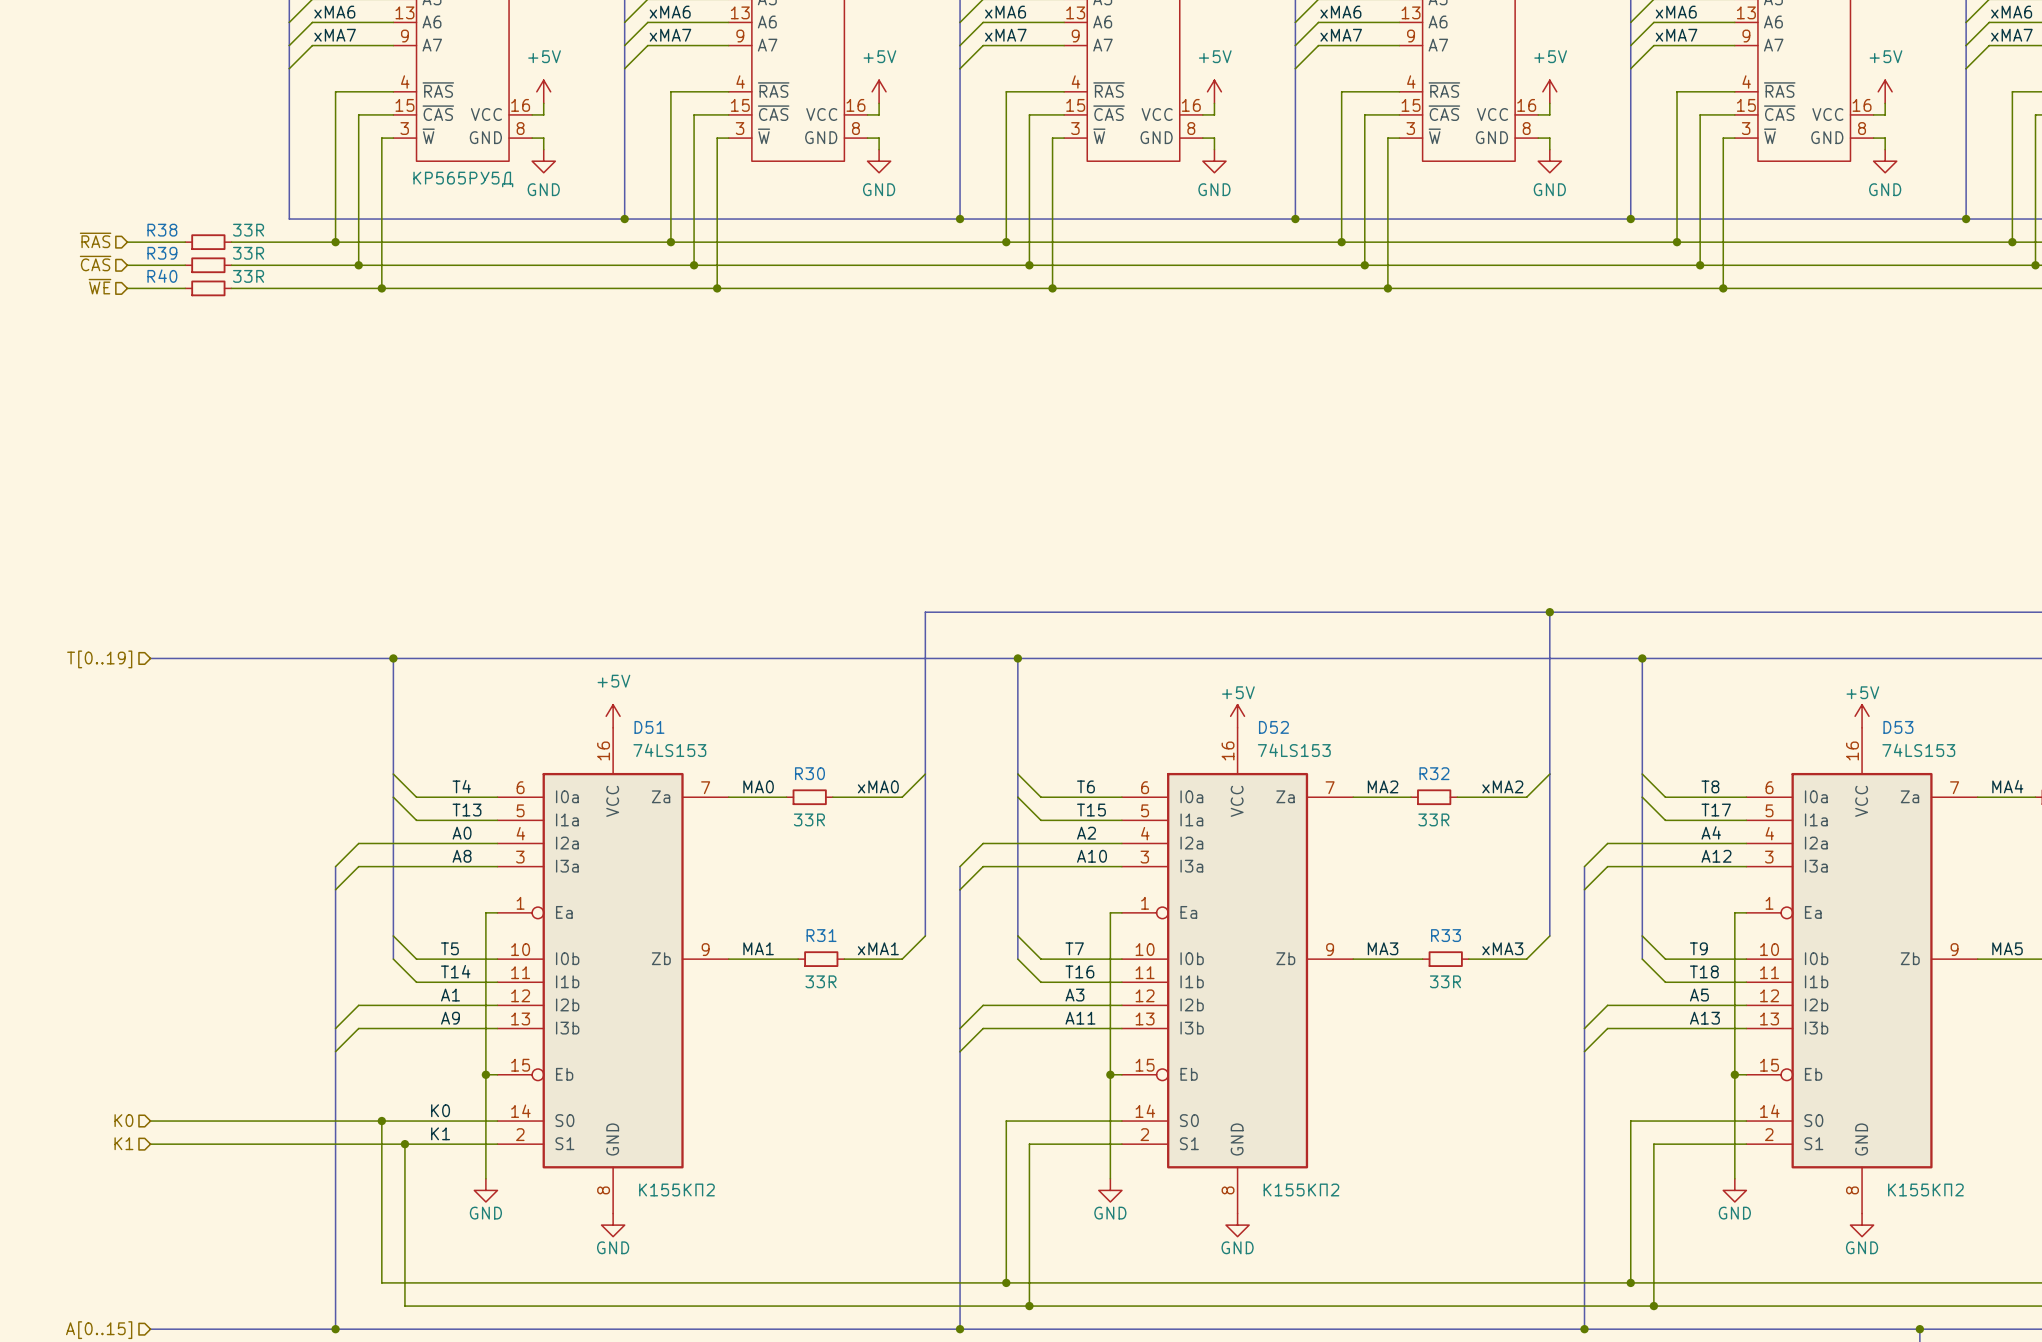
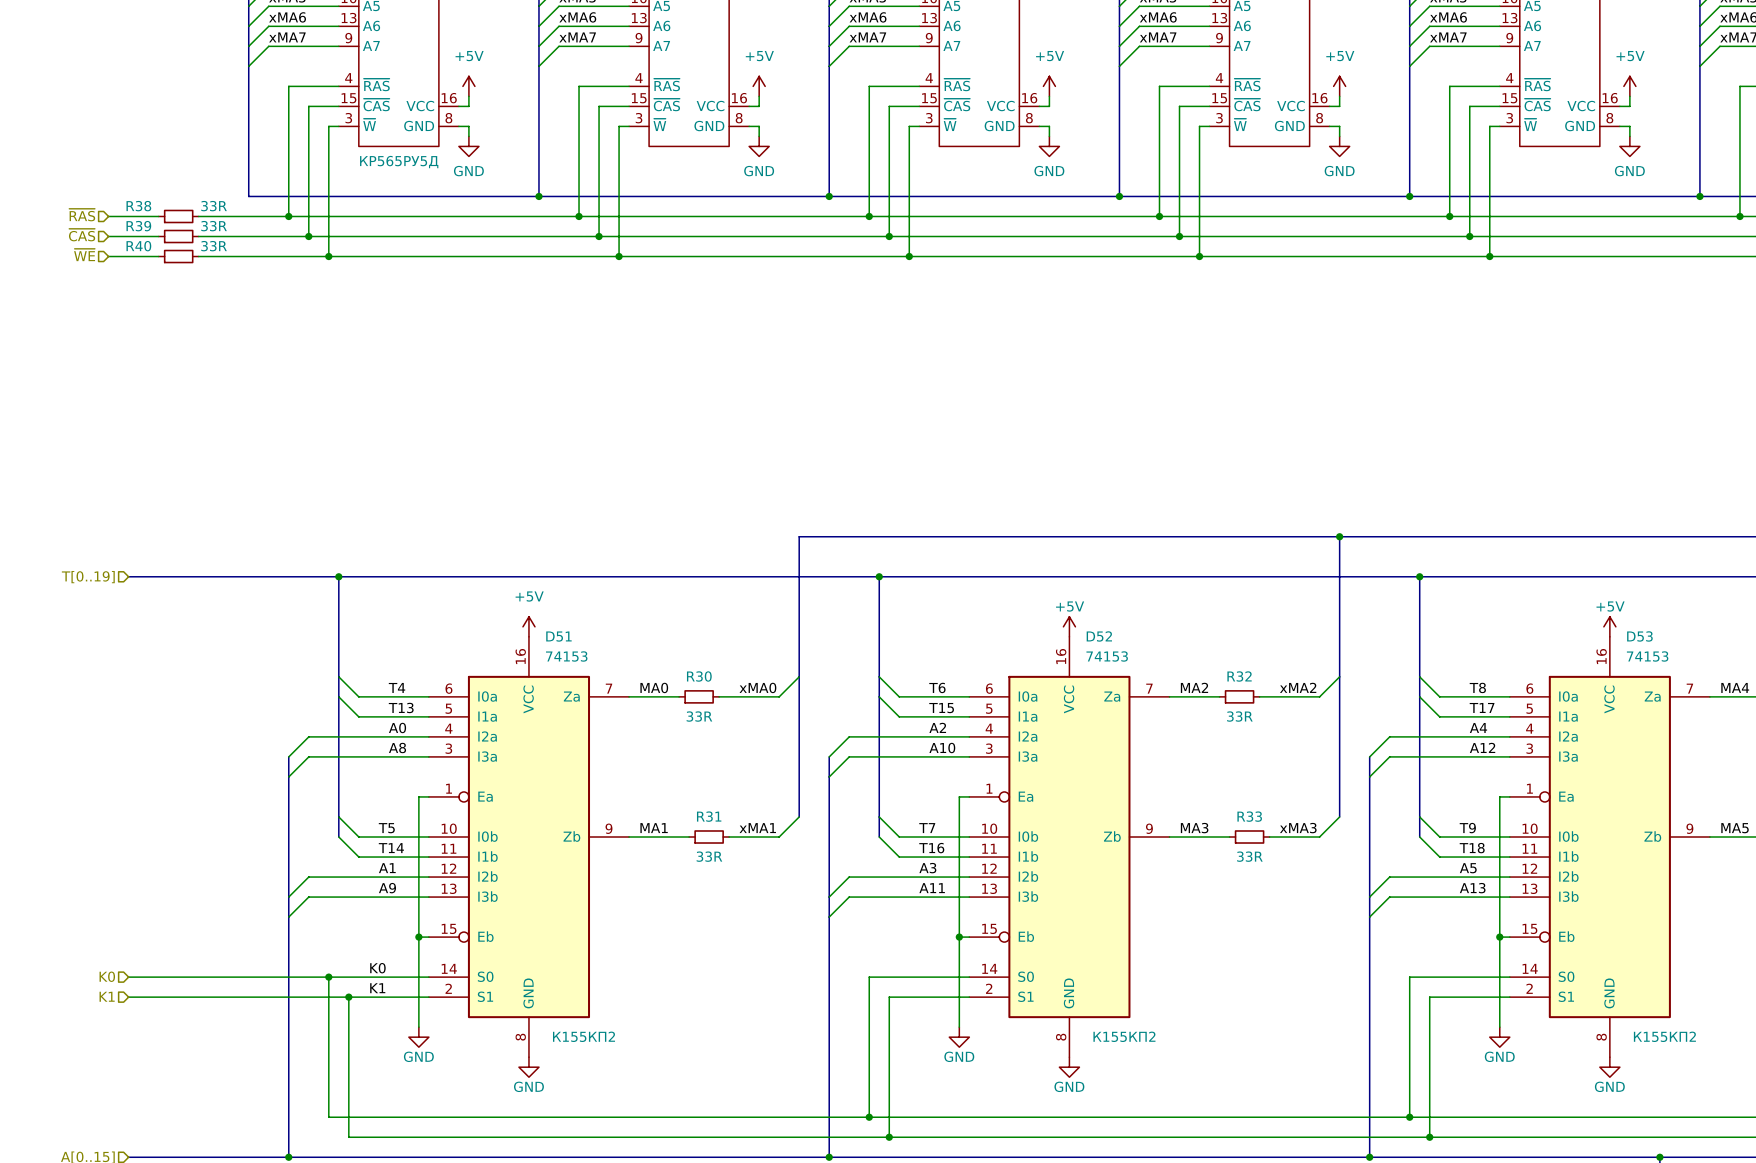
D51 value: 74LS153 (669, 750) -> 74153 (566, 656)
D52 value: 74LS153 (1294, 750) -> 74153 (1107, 656)
D53 value: 74LS153 (1918, 750) -> 74153 (1647, 656)

